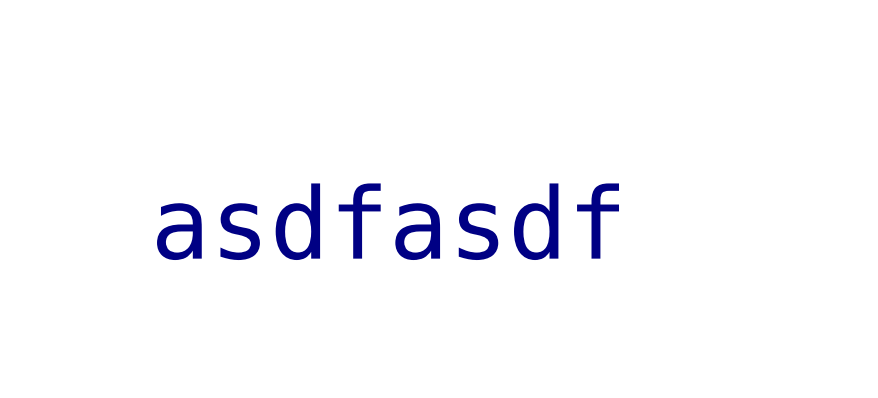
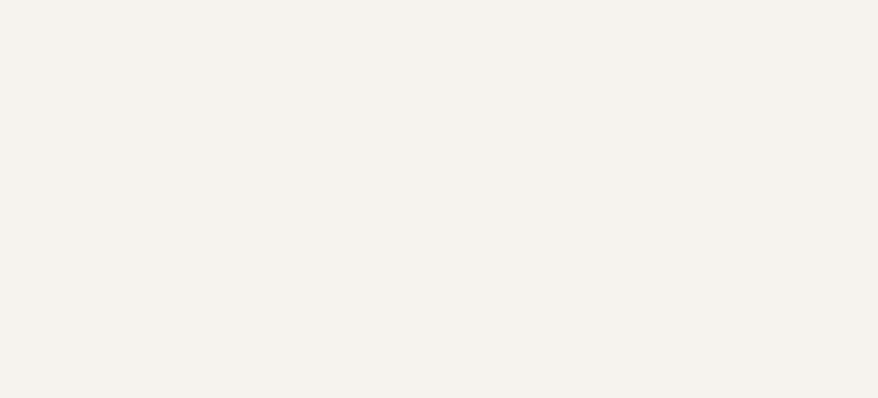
text: asdfasdf (388, 221) -> none

